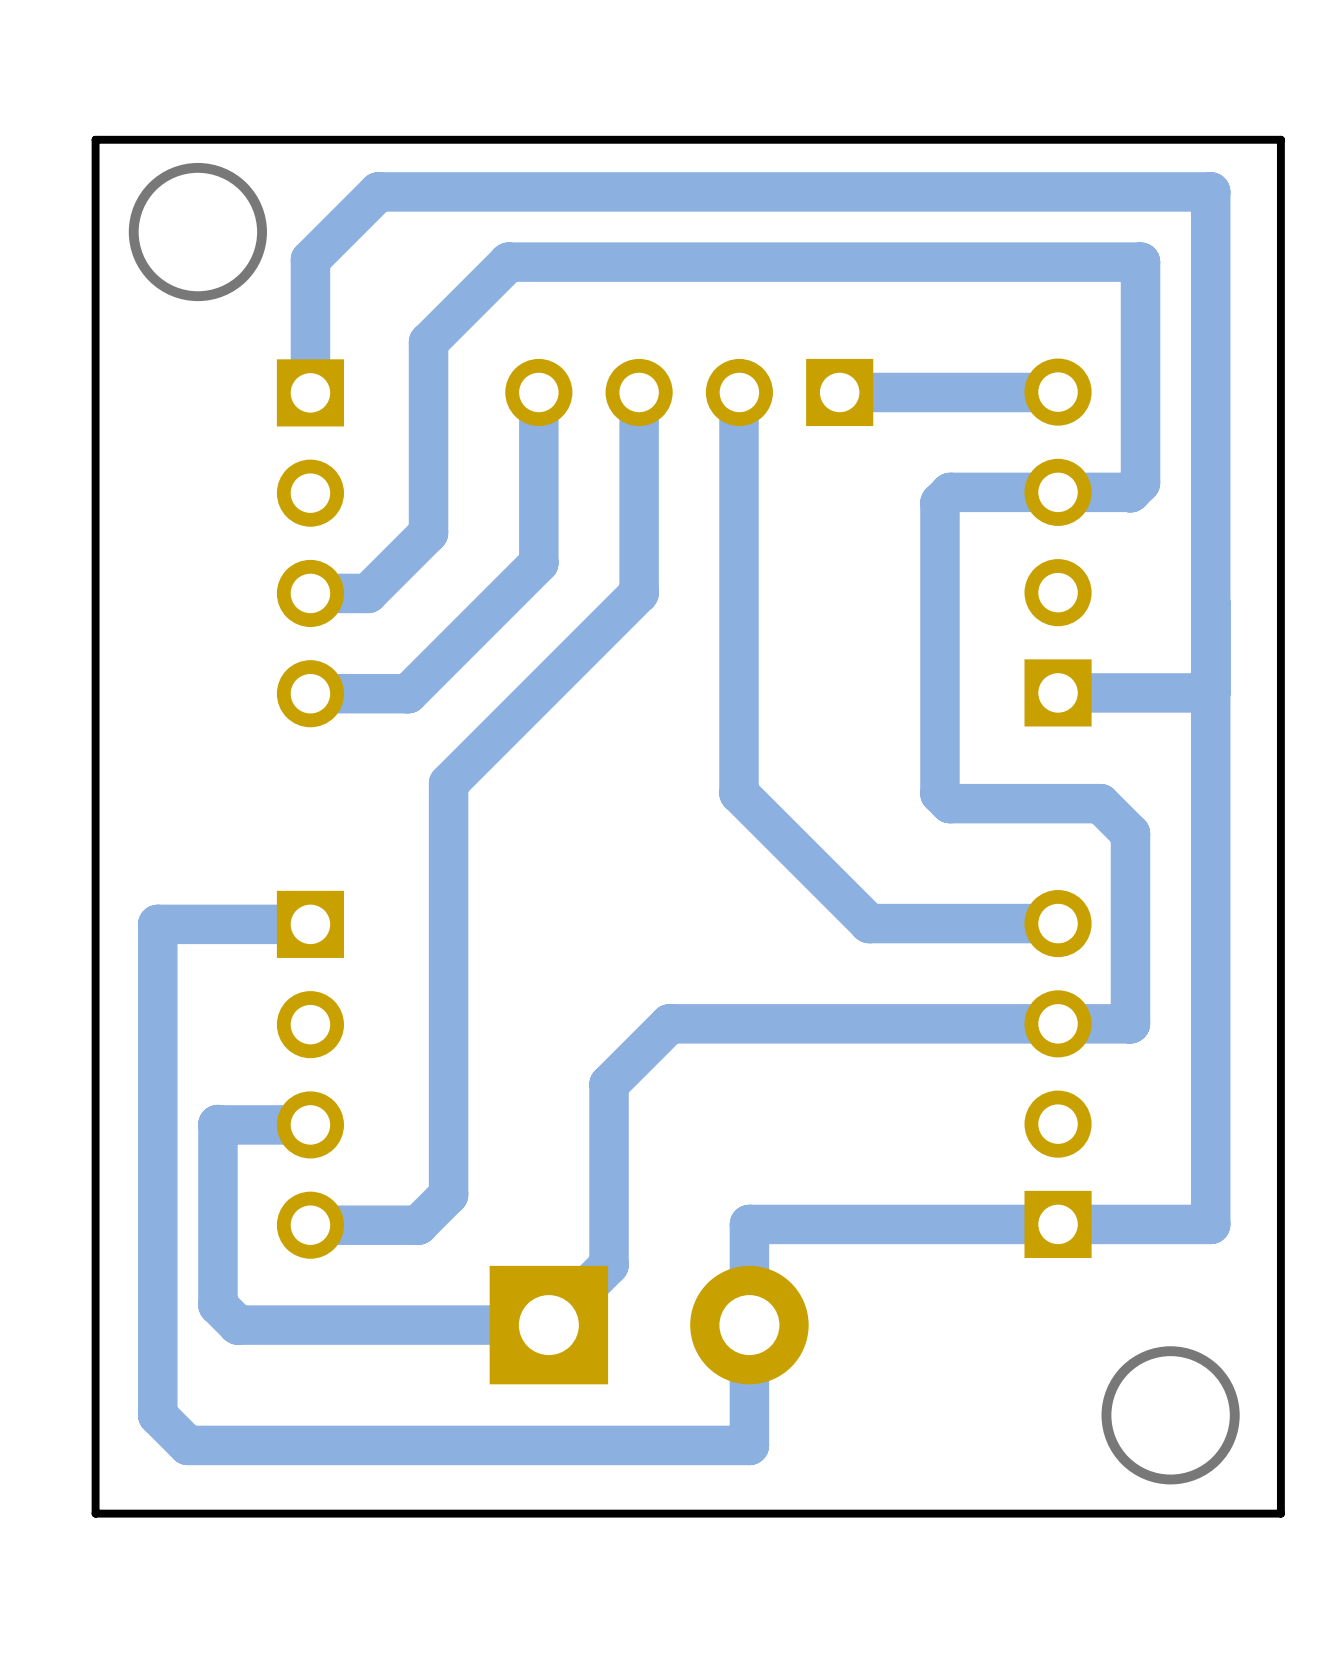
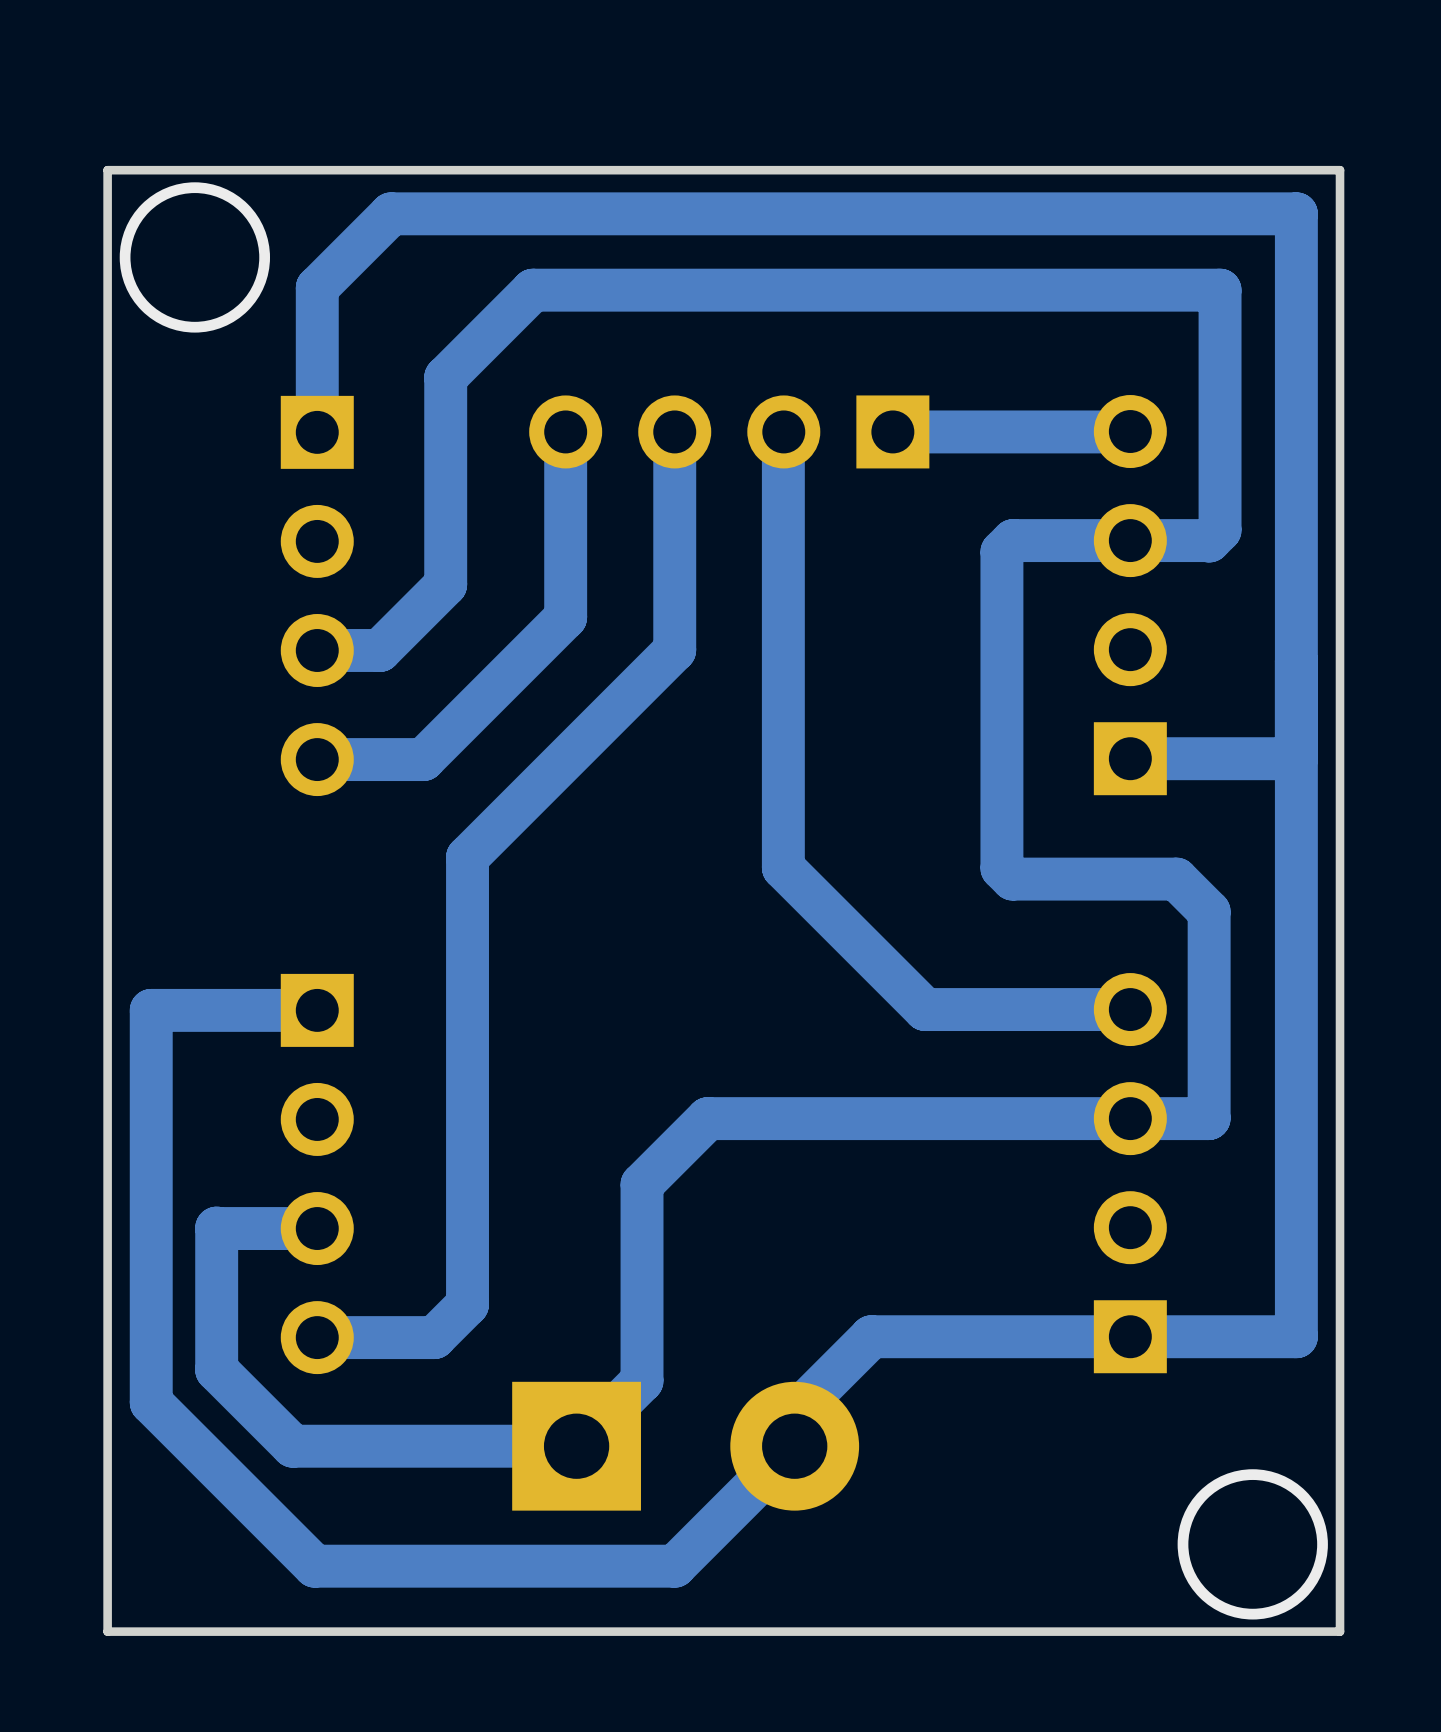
board edge: (1280, 139) (95, 139) (95, 1513) (1280, 1513) (1280, 139) -> (1340, 170) (1340, 1631) (107, 1631) (107, 170) (1340, 170)
bottom track: (820, 1224) (749, 1224) (749, 1295) -> (871, 1336) (794, 1413)
bottom track: (217, 1254) (217, 1305) (237, 1325) (288, 1325) -> (216, 1369) (293, 1446)
bottom track: (157, 1284) (157, 1415) (187, 1445) (749, 1445) (749, 1325) -> (151, 1402) (314, 1566) (674, 1566) (794, 1446)

